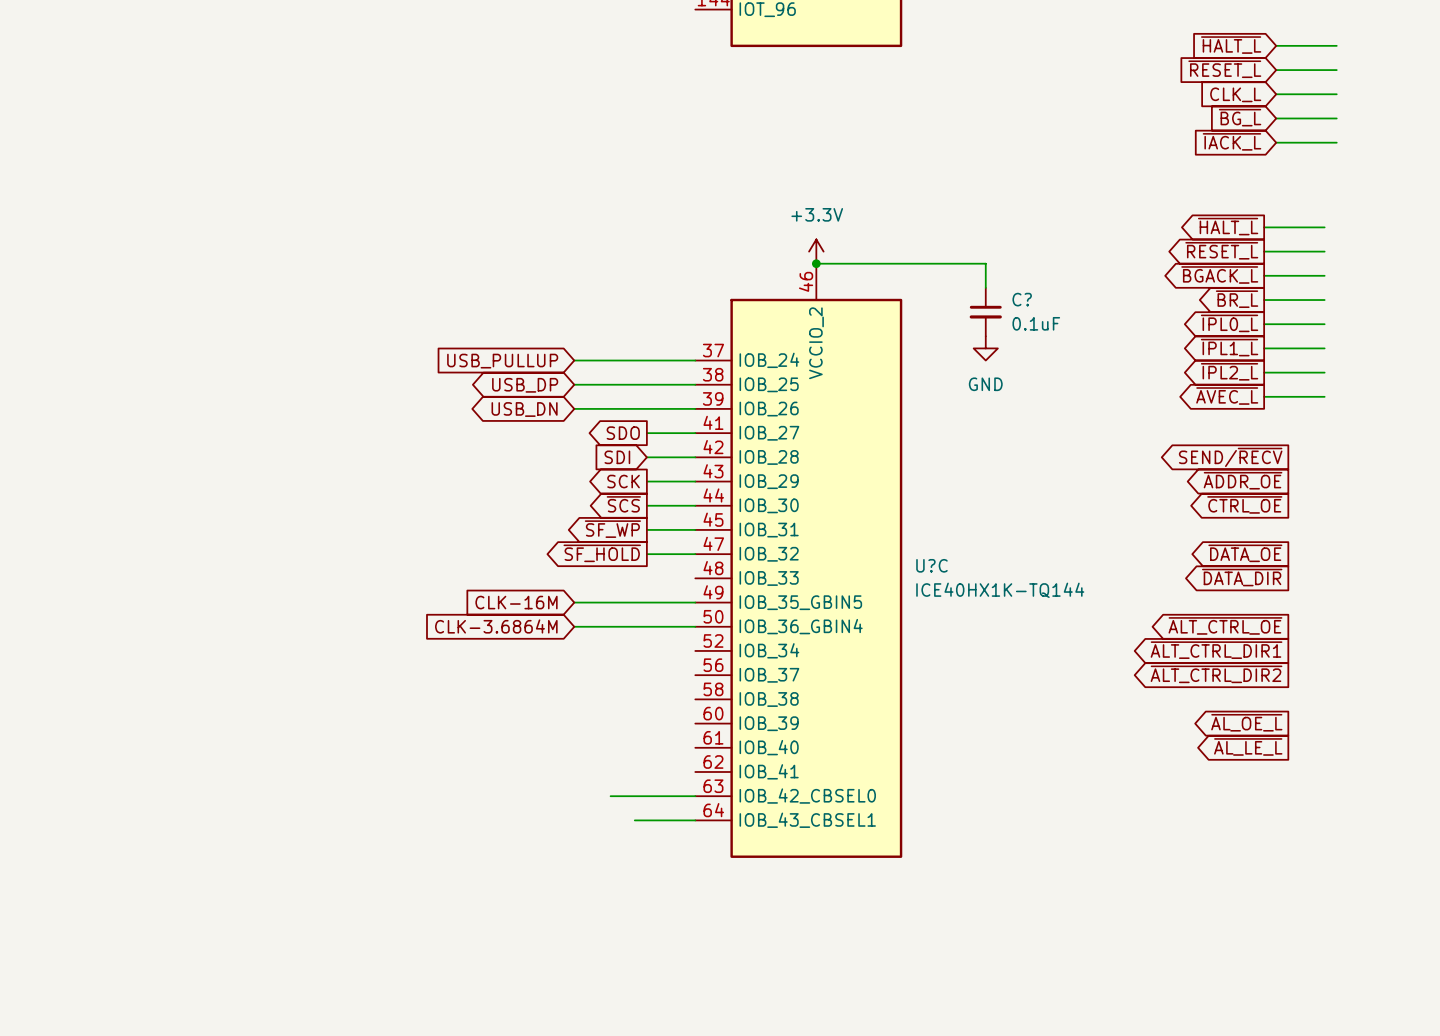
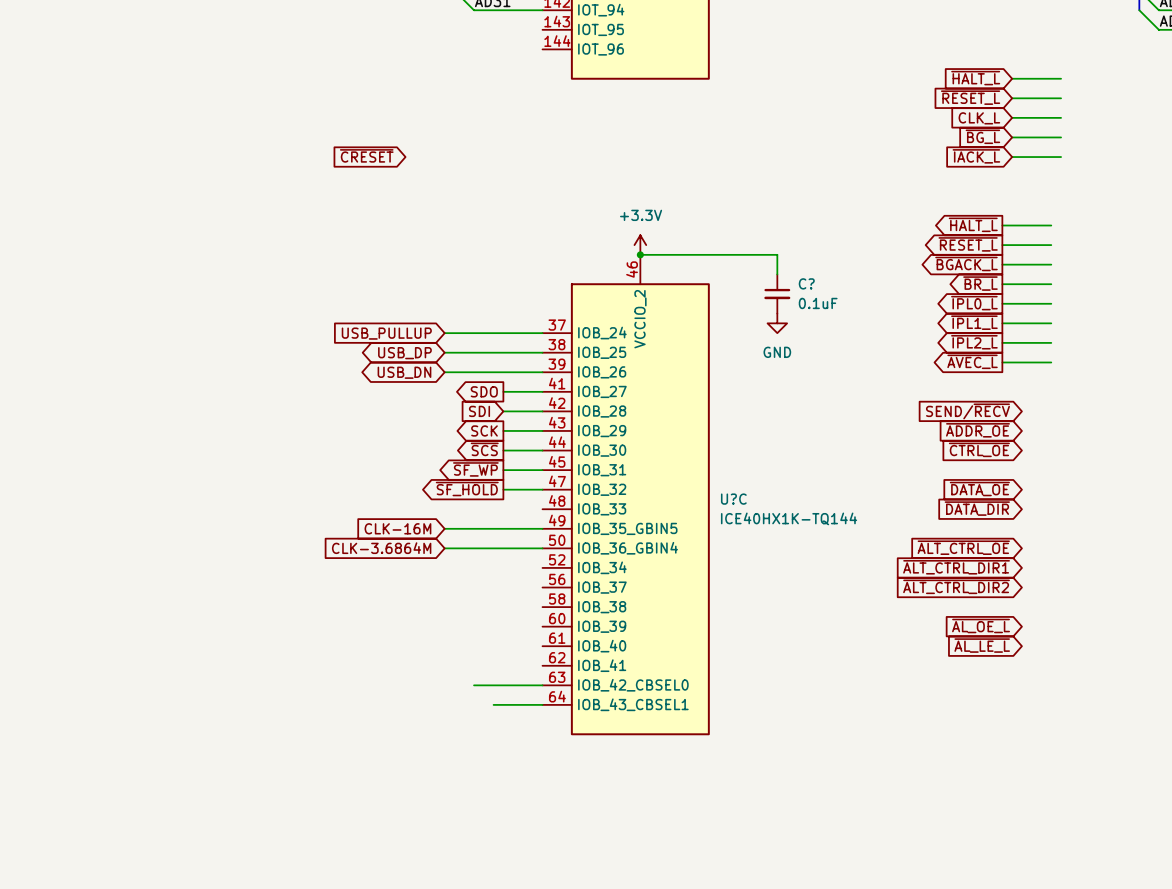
global label: none -> ~{CRESET} (366, 155)
global label shape: output (1230, 457) -> input (967, 411)
global label shape: output (1243, 480) -> input (977, 430)
global label shape: output (1244, 504) -> input (979, 449)
global label shape: output (1245, 553) -> input (979, 489)
global label shape: output (1242, 577) -> input (977, 508)
global label shape: output (1225, 625) -> input (963, 547)
global label shape: output (1216, 650) -> input (956, 567)
global label shape: output (1216, 674) -> input (956, 586)
global label shape: output (1246, 722) -> input (981, 625)
global label shape: output (1248, 746) -> input (982, 645)

